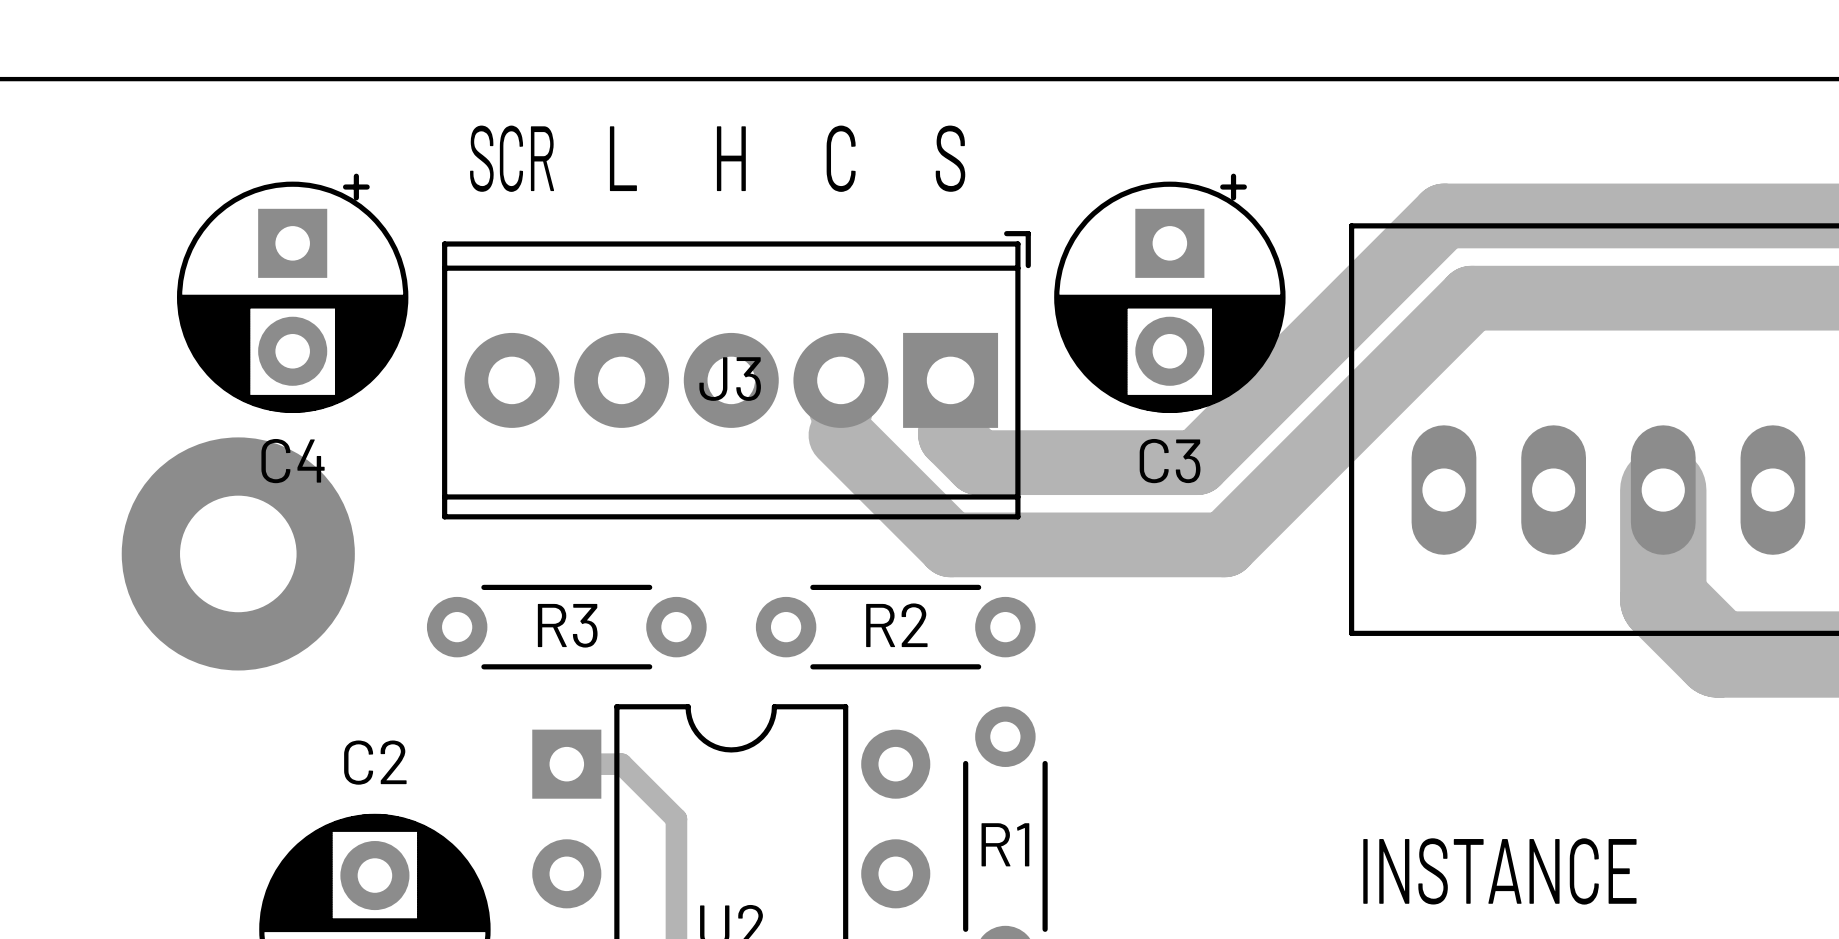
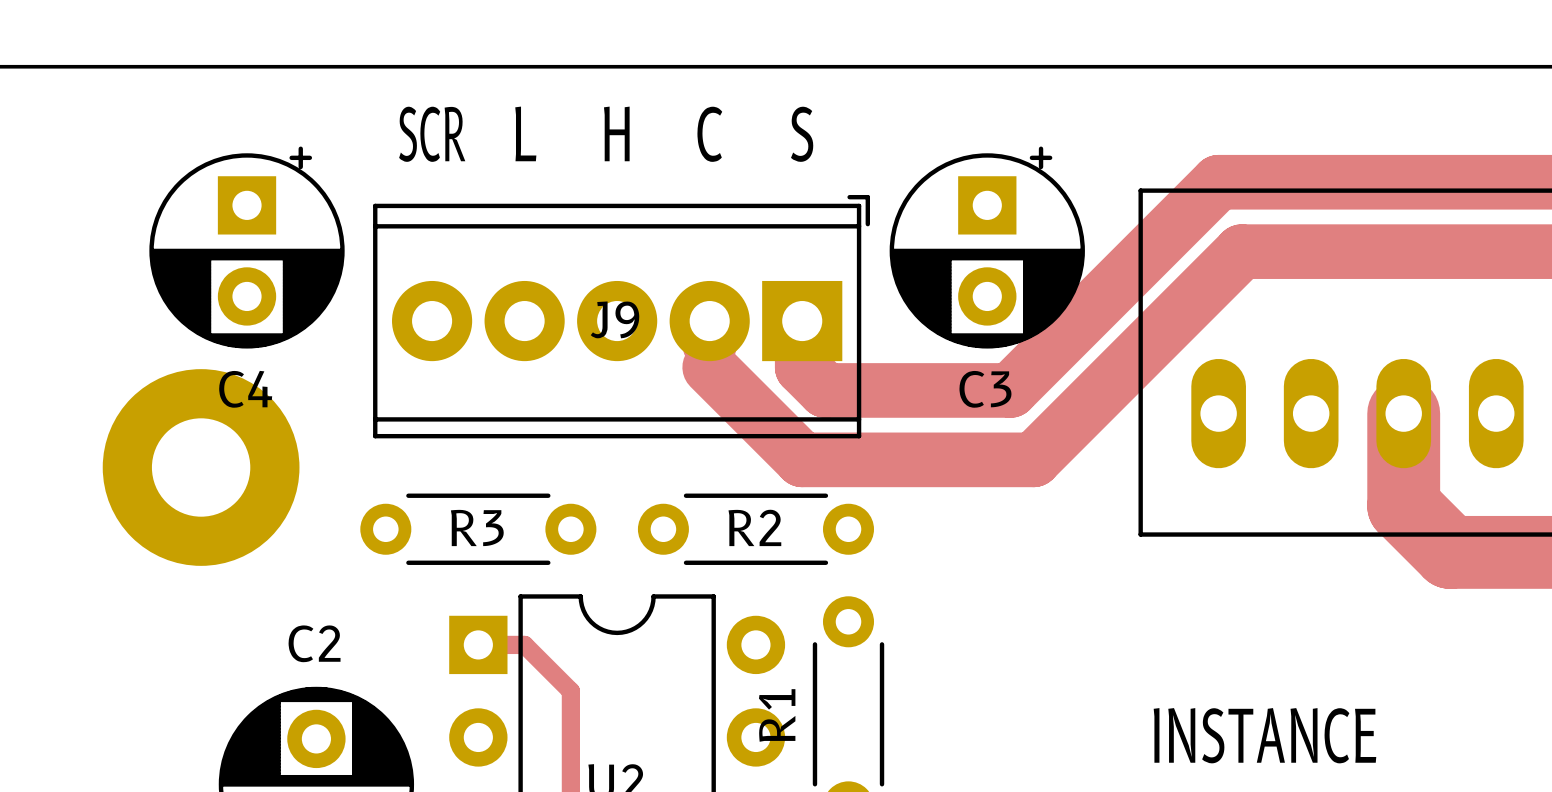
J3 name: J3 (730, 379) -> J9 (615, 319)
R1 name rotation: 0° (1005, 844) -> 90° counterclockwise (777, 715)

